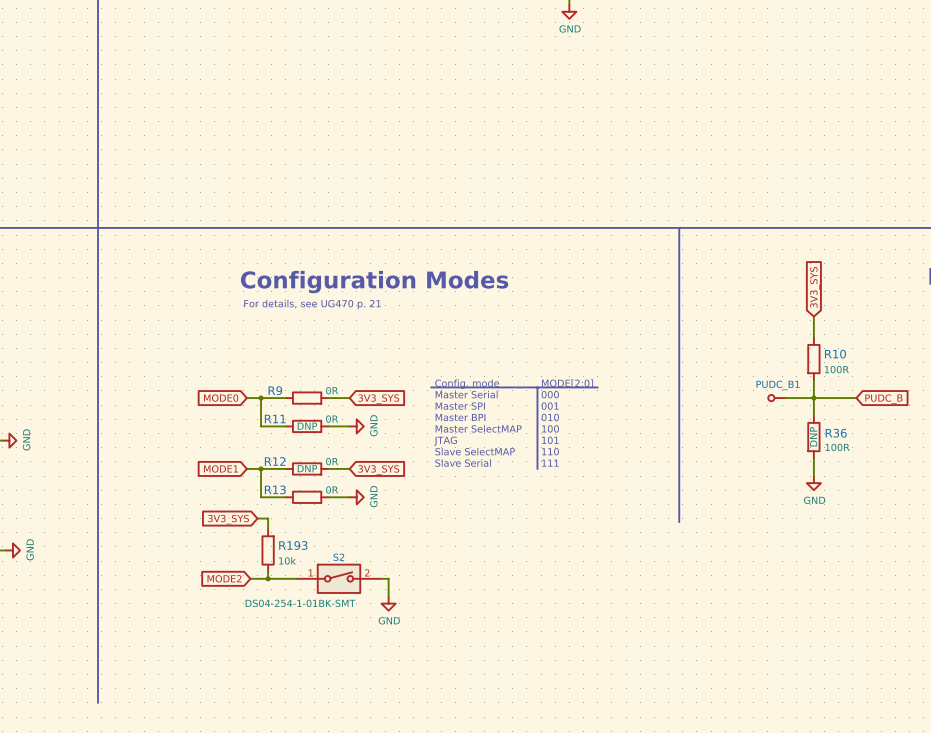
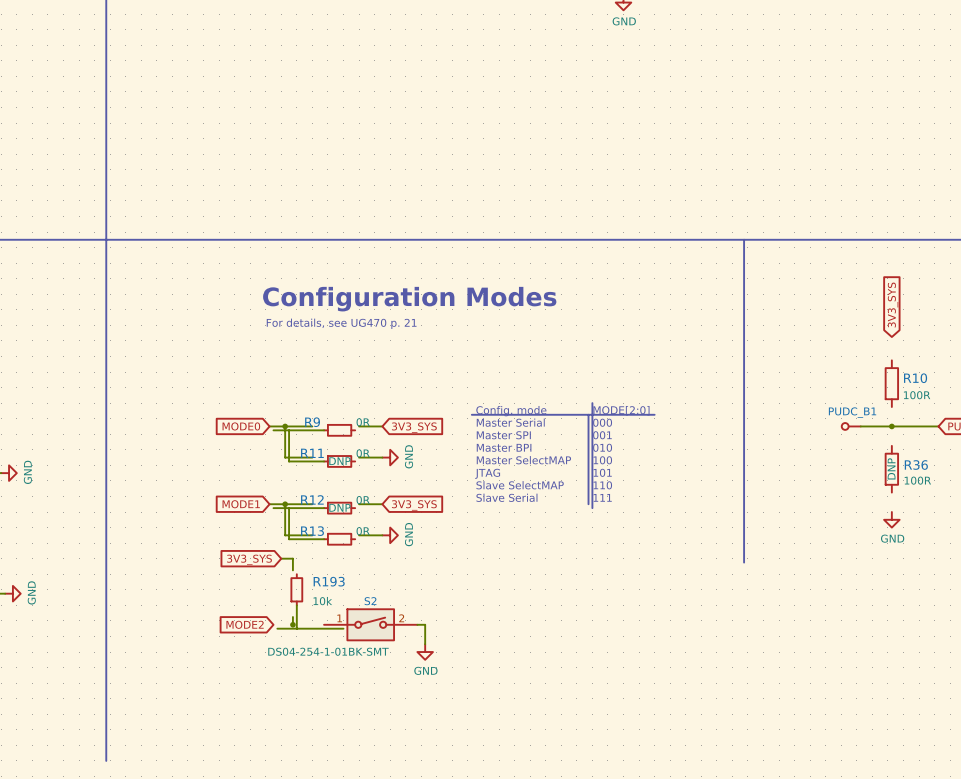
wire: (813, 316) (813, 337) -> none
line: none -> (592, 403) (592, 508)
wire: (813, 380) (813, 415) -> none
R9 symbol: [285, 391, 329, 405] -> [324, 424, 356, 437]
wire: none -> (273, 430) (324, 430)
wire: none -> (289, 430) (289, 461) (324, 461)
R11 symbol: [285, 420, 329, 433] -> [324, 455, 356, 468]
wire: (813, 458) (813, 476) -> none
R12 symbol: [285, 462, 329, 476] -> [324, 501, 356, 515]
wire: none -> (289, 508) (289, 539) (324, 539)
R13 symbol: [285, 490, 329, 504] -> [324, 533, 356, 546]
R193 symbol: [261, 529, 275, 572] -> [290, 574, 304, 606]
wire: none -> (296, 605) (296, 628)
wire: (250, 578) (296, 578) -> (273, 508) (324, 508)
wire: none -> (277, 628) (343, 628)

